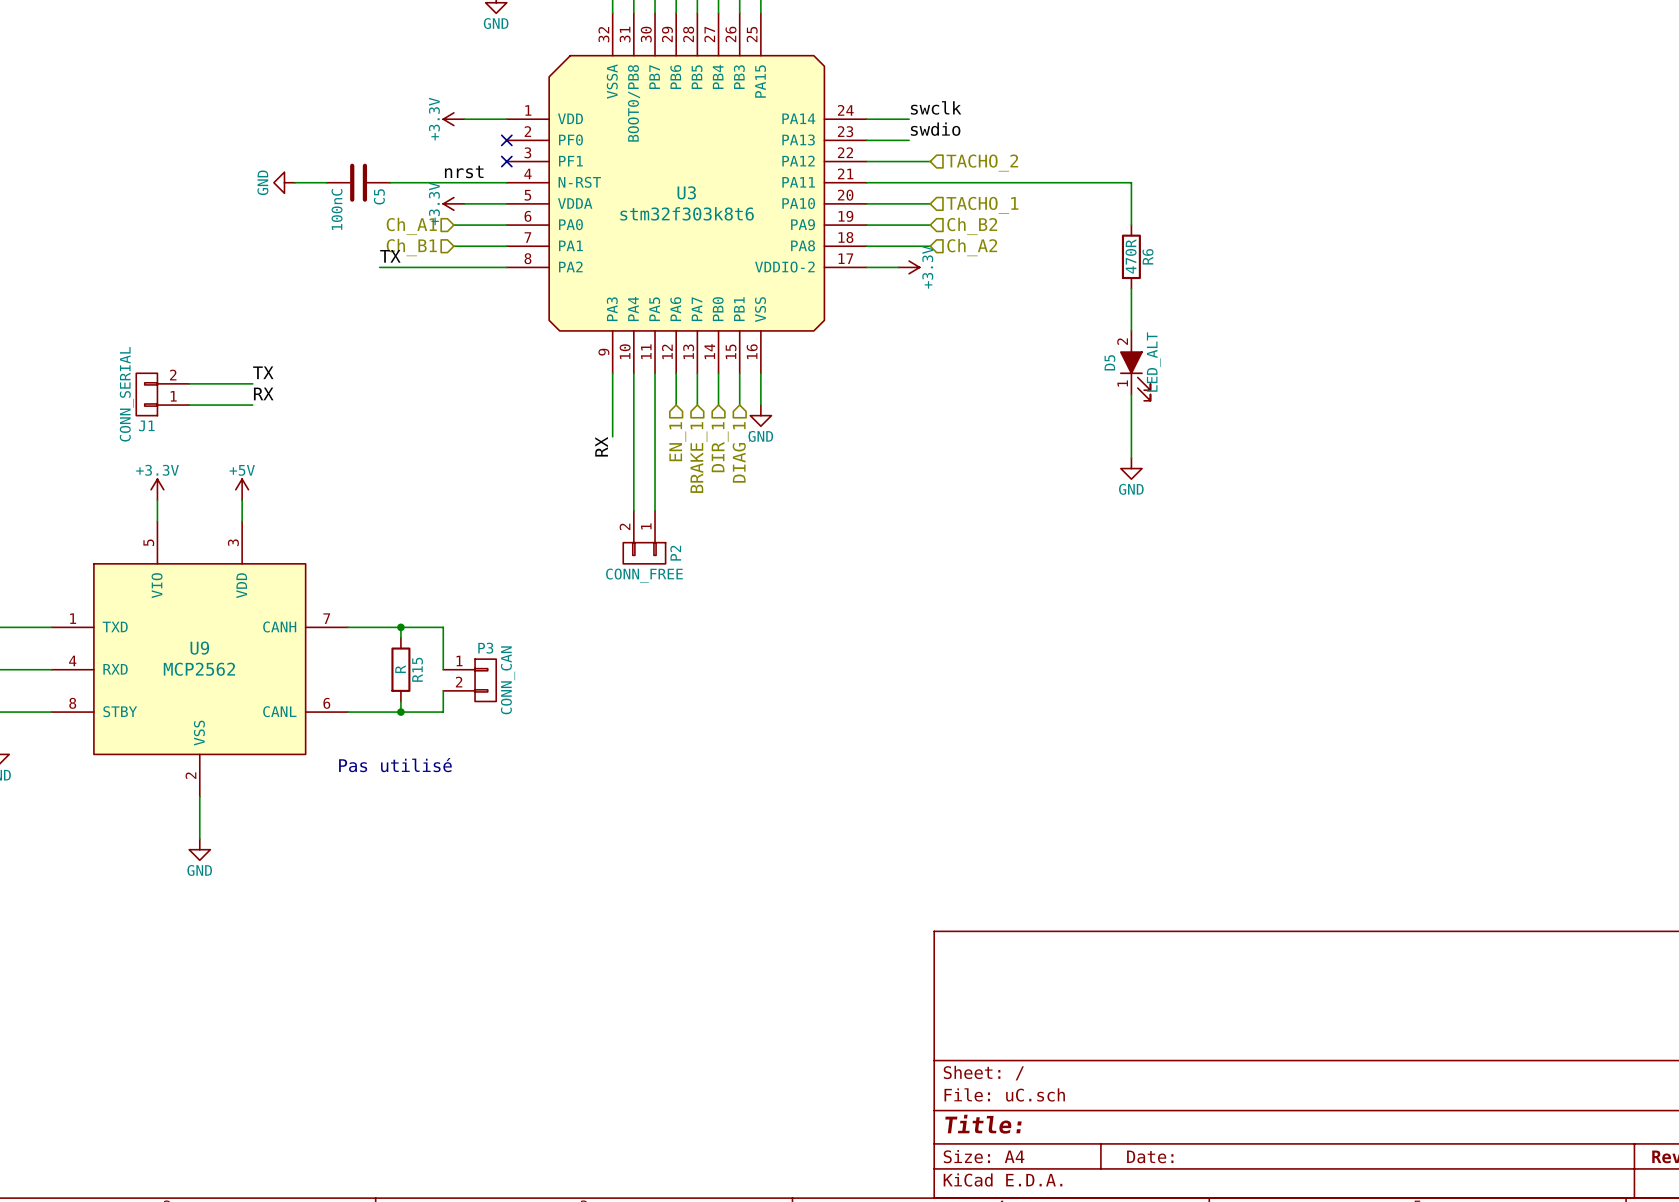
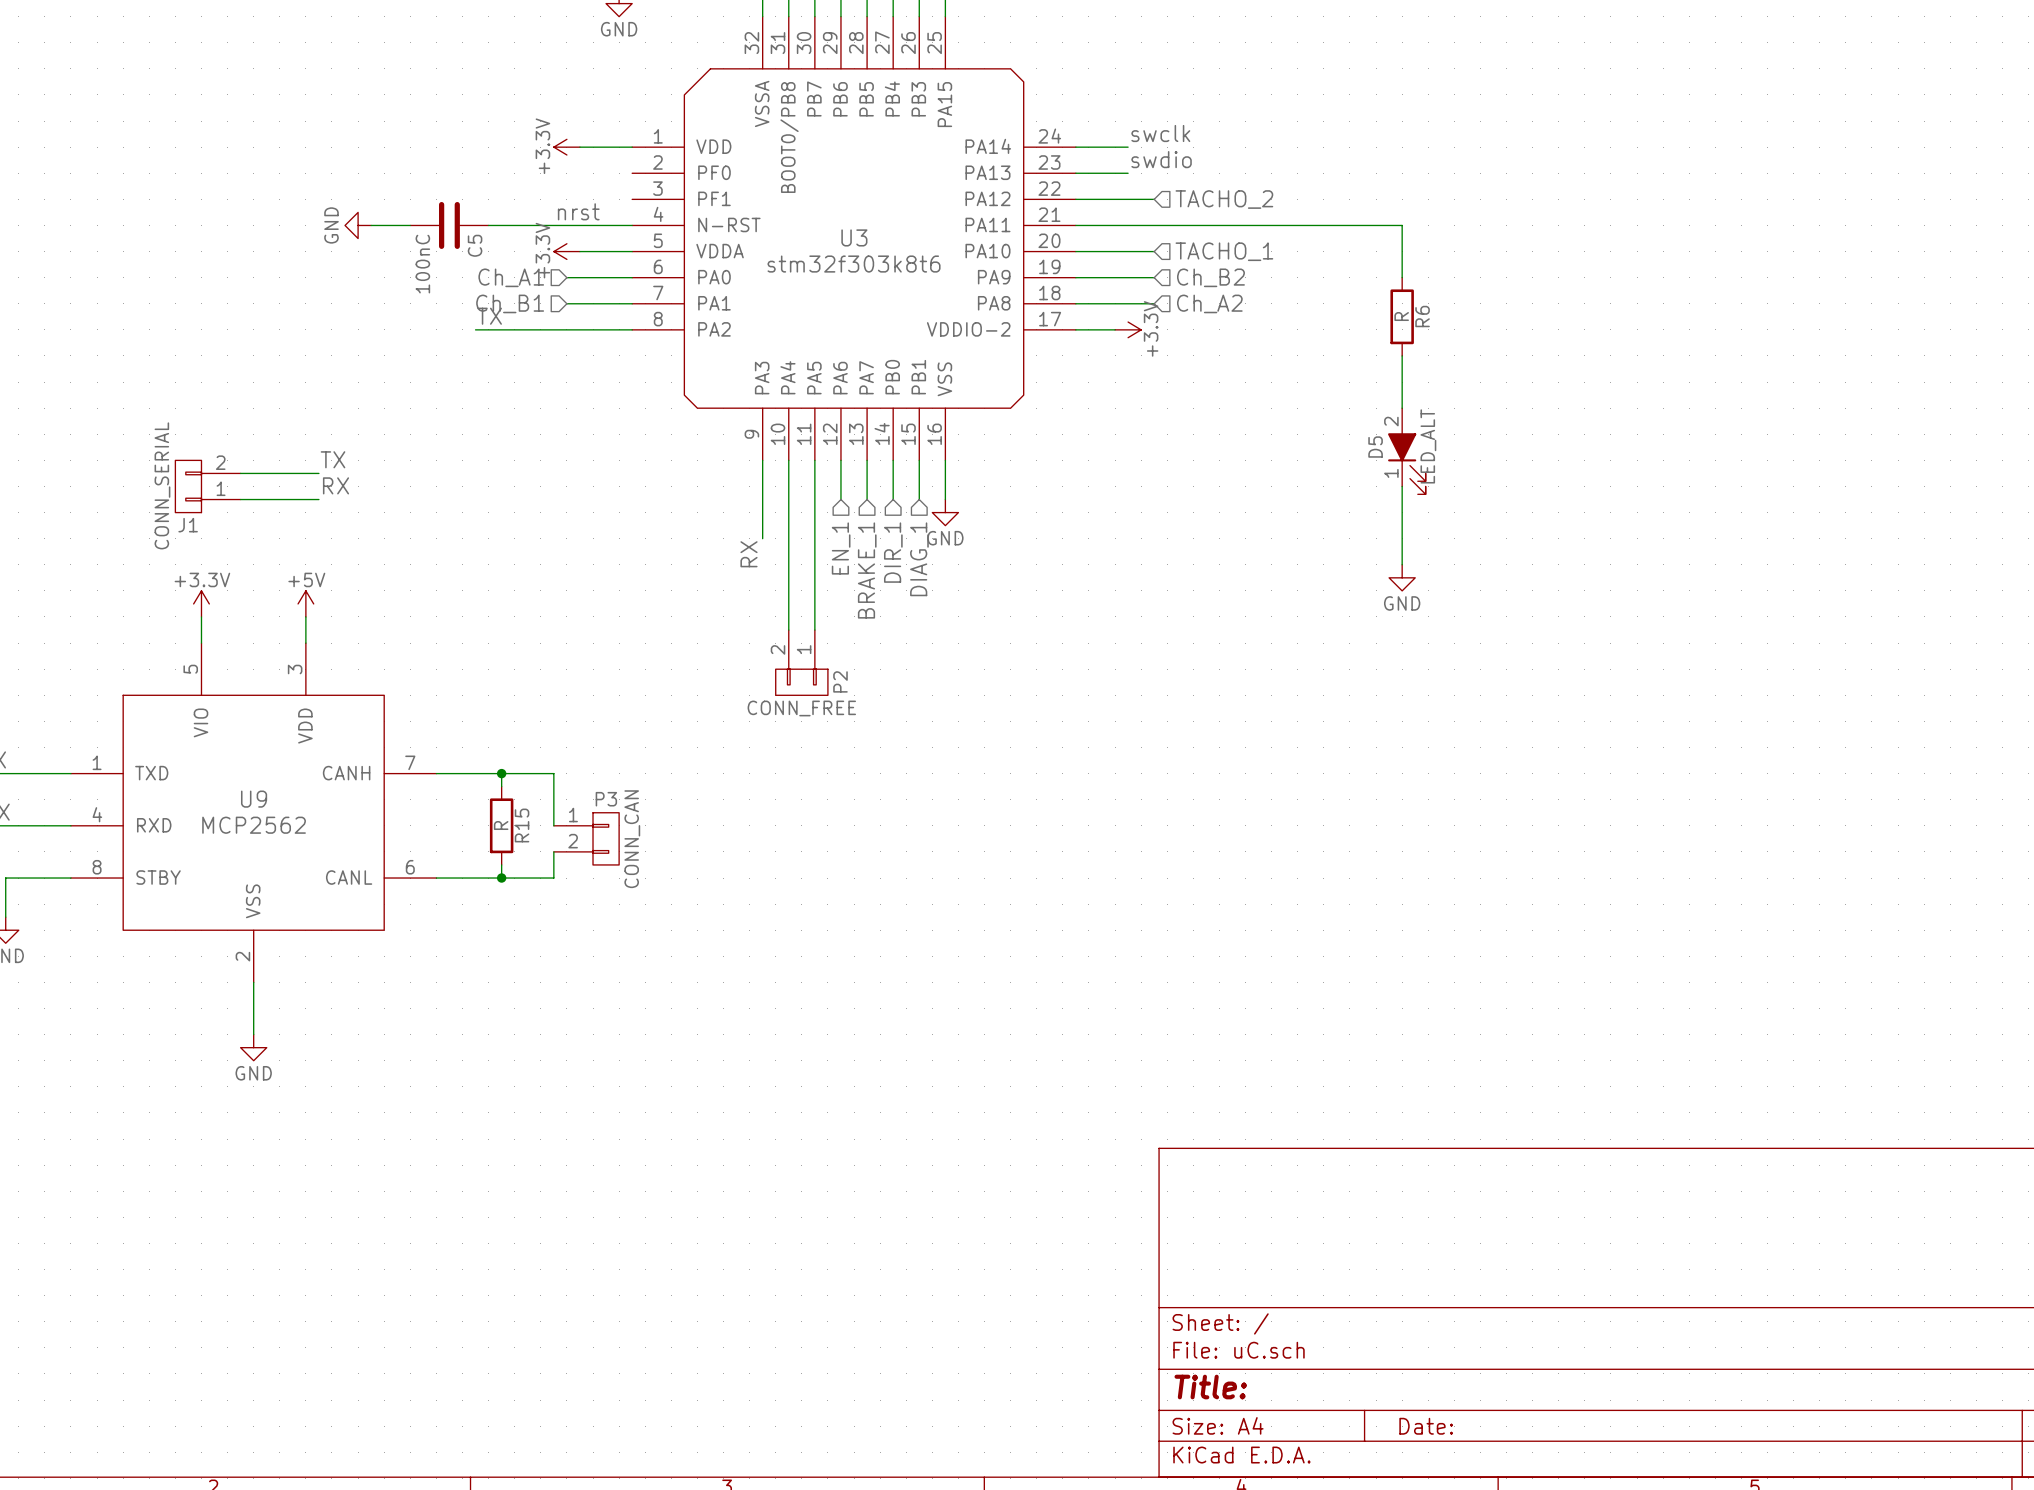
no-connect mark: (506, 140) -> none
no-connect mark: (506, 161) -> none
R6 value: 470R (1131, 256) -> R (1401, 316)
text: Pas utilisé (395, 765) -> none

